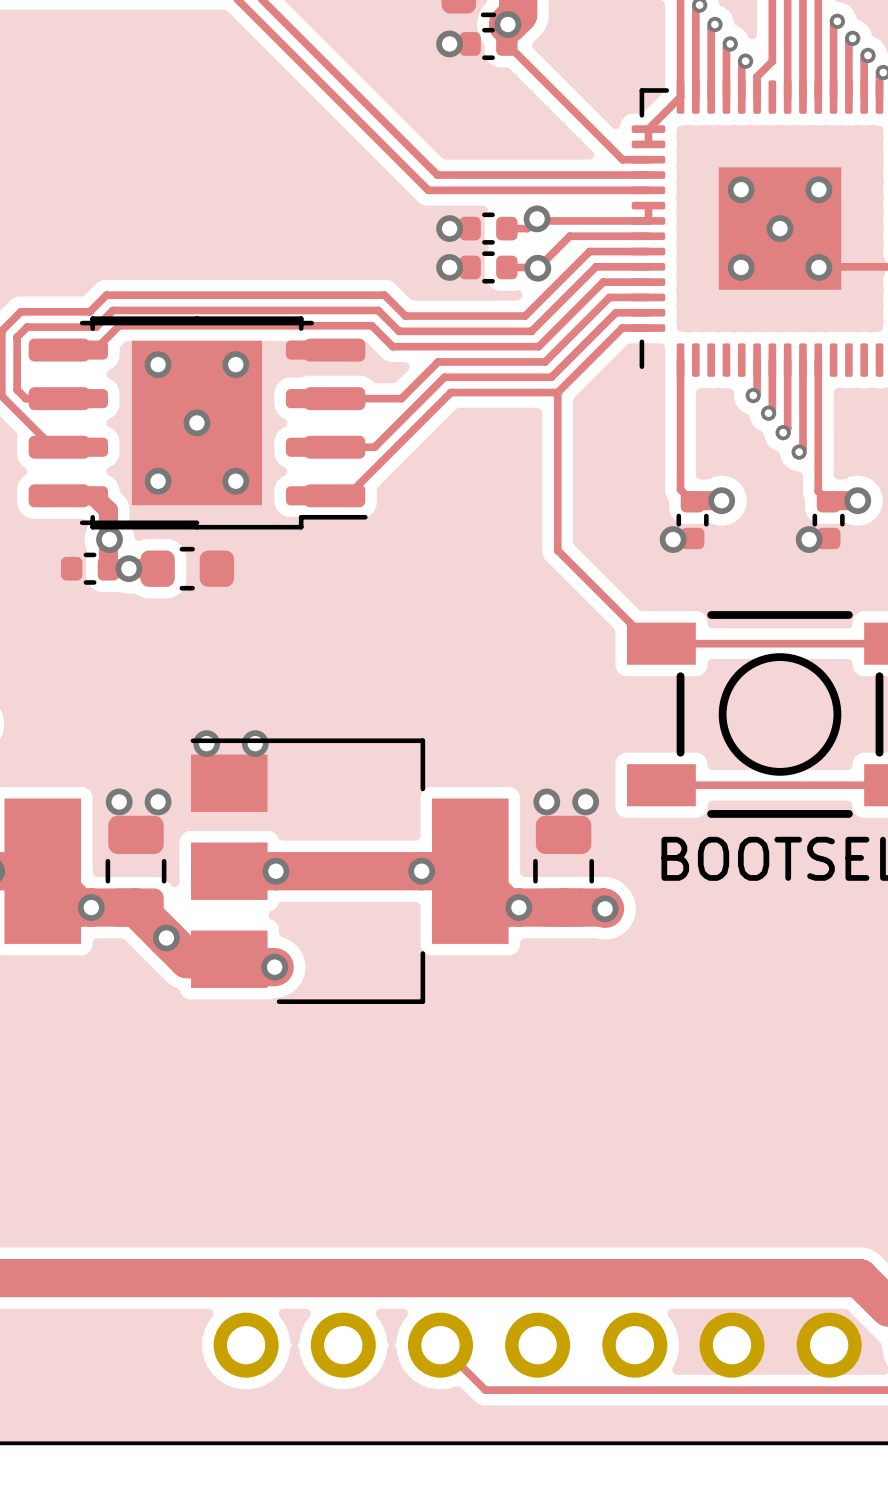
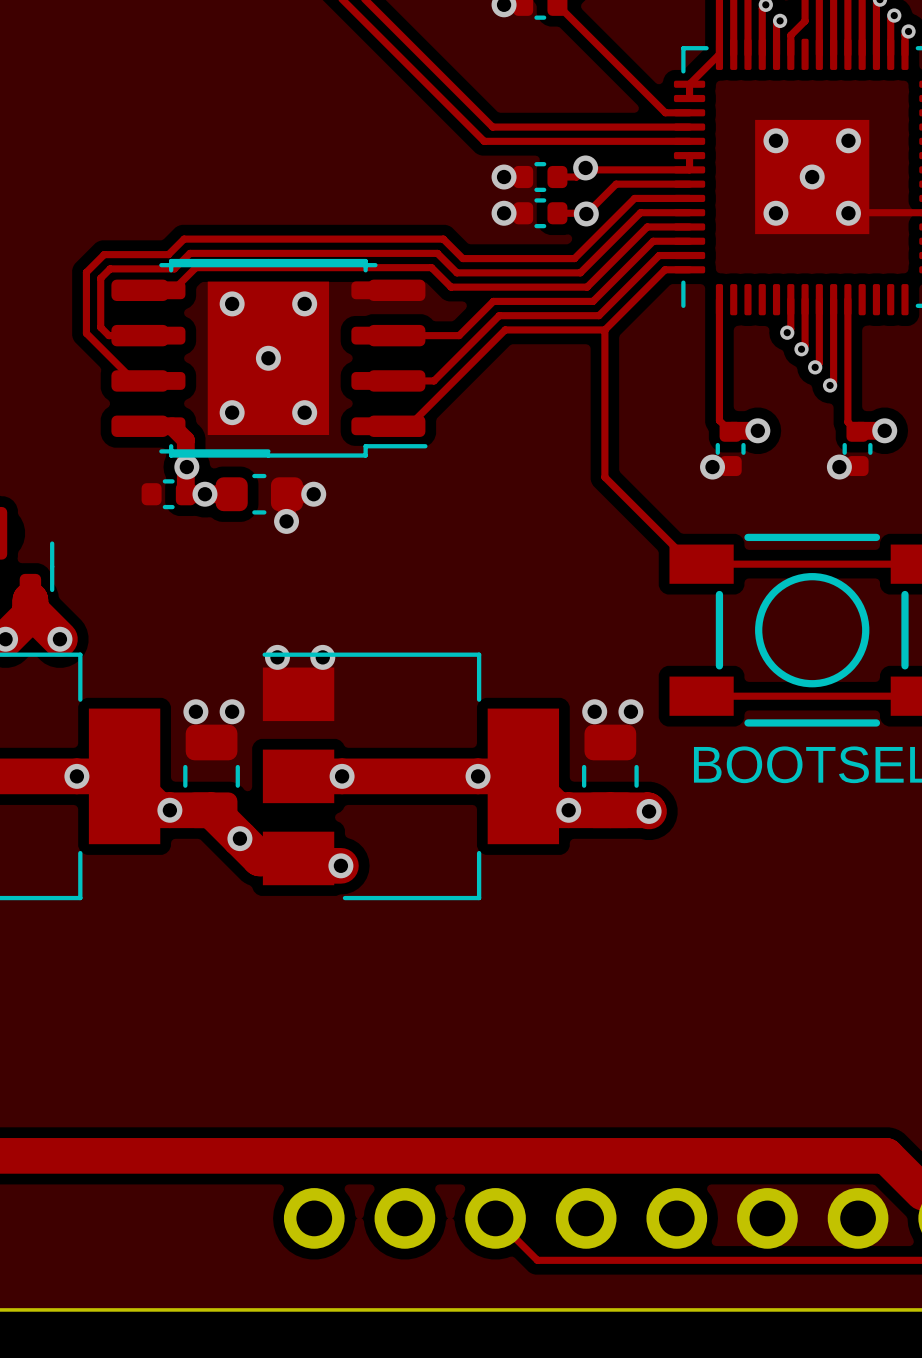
via: none -> (313, 494)
via: none -> (286, 521)

